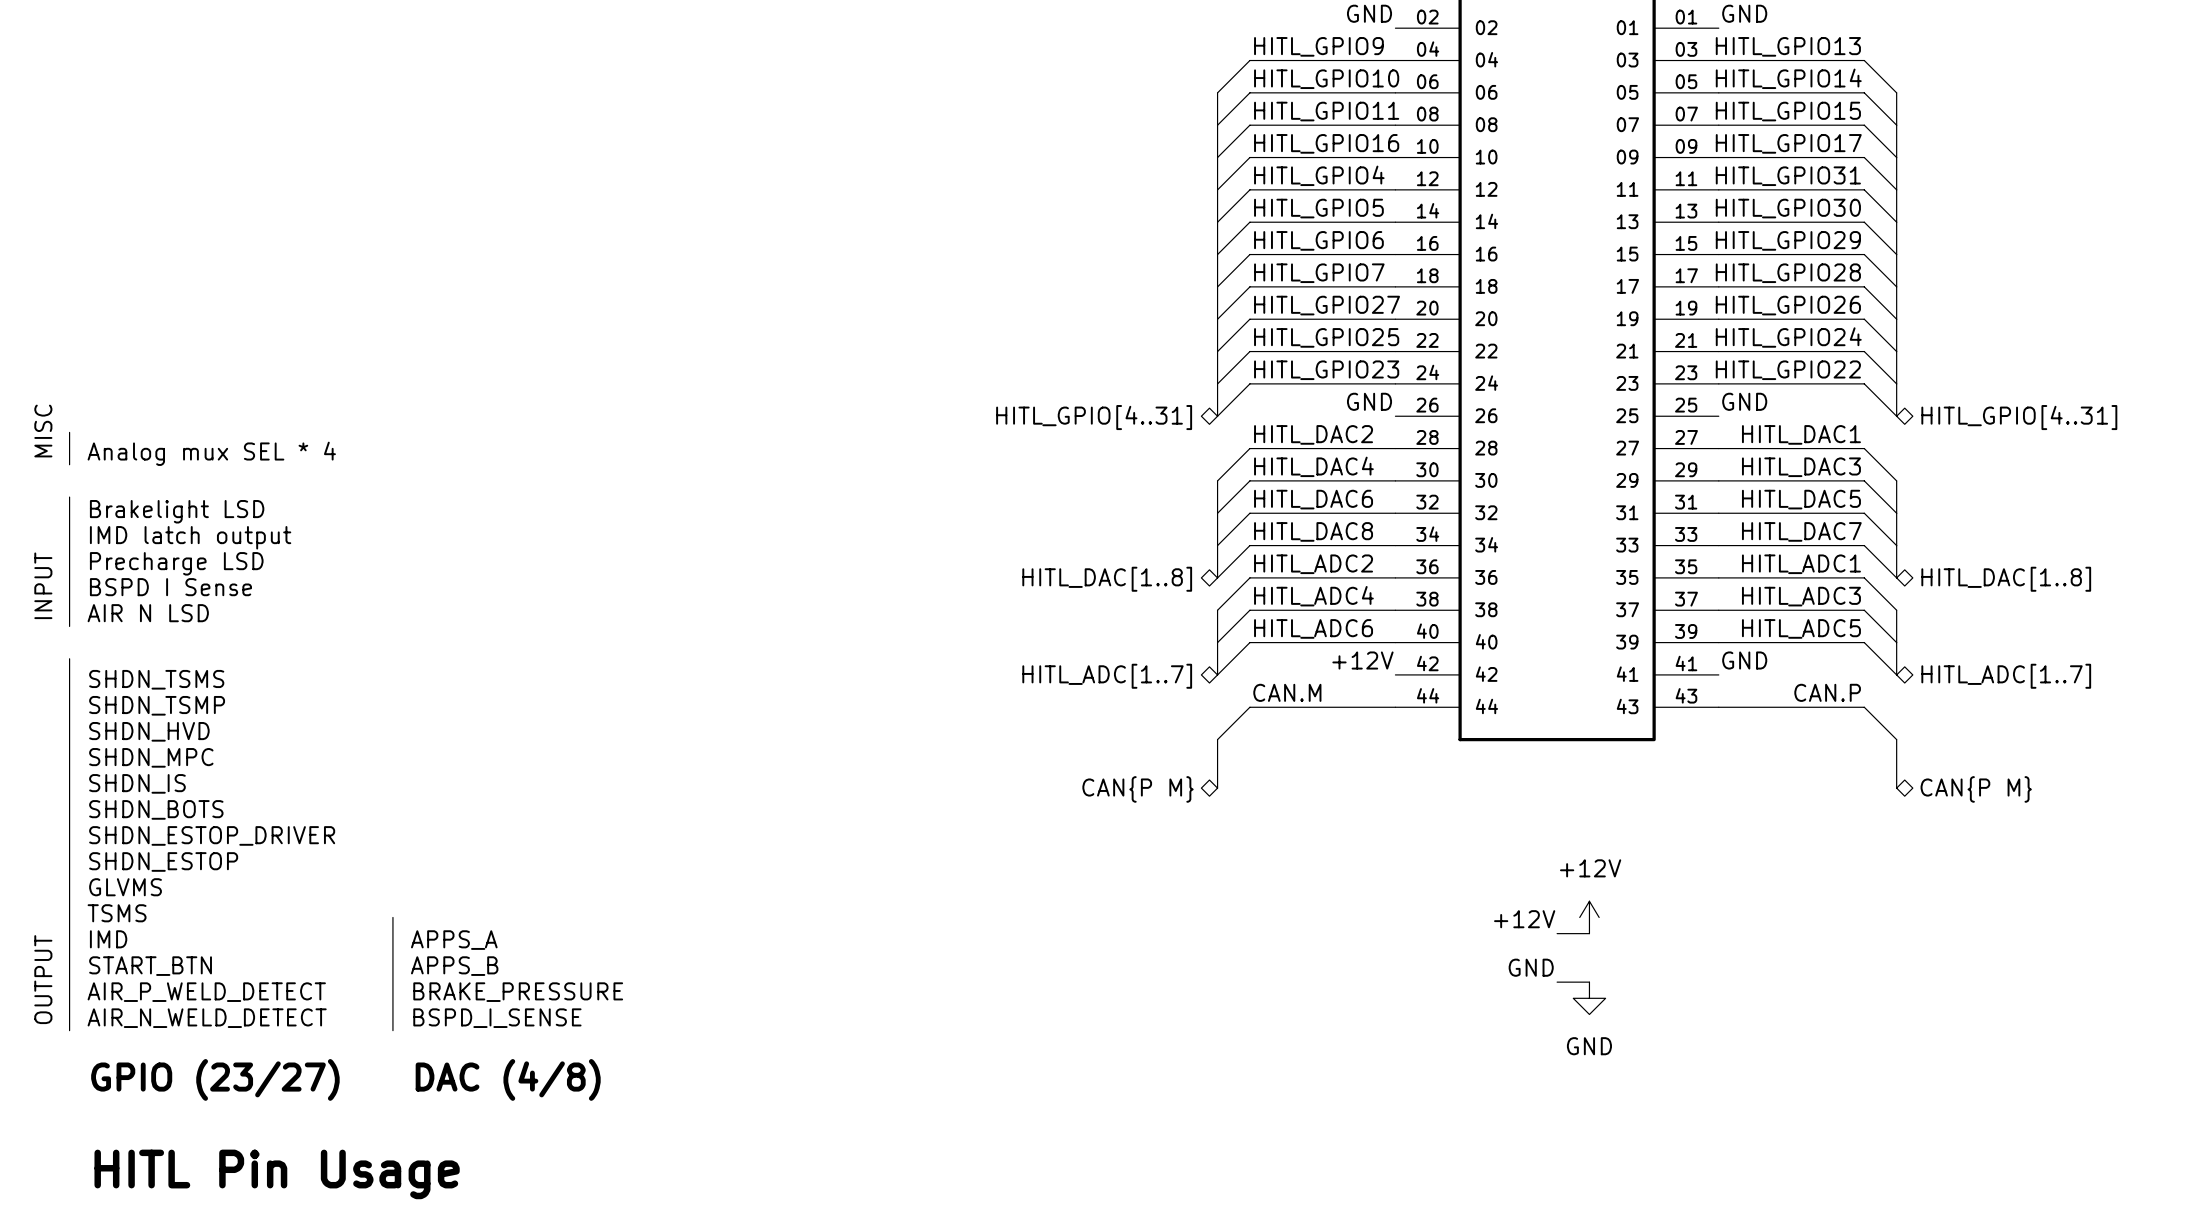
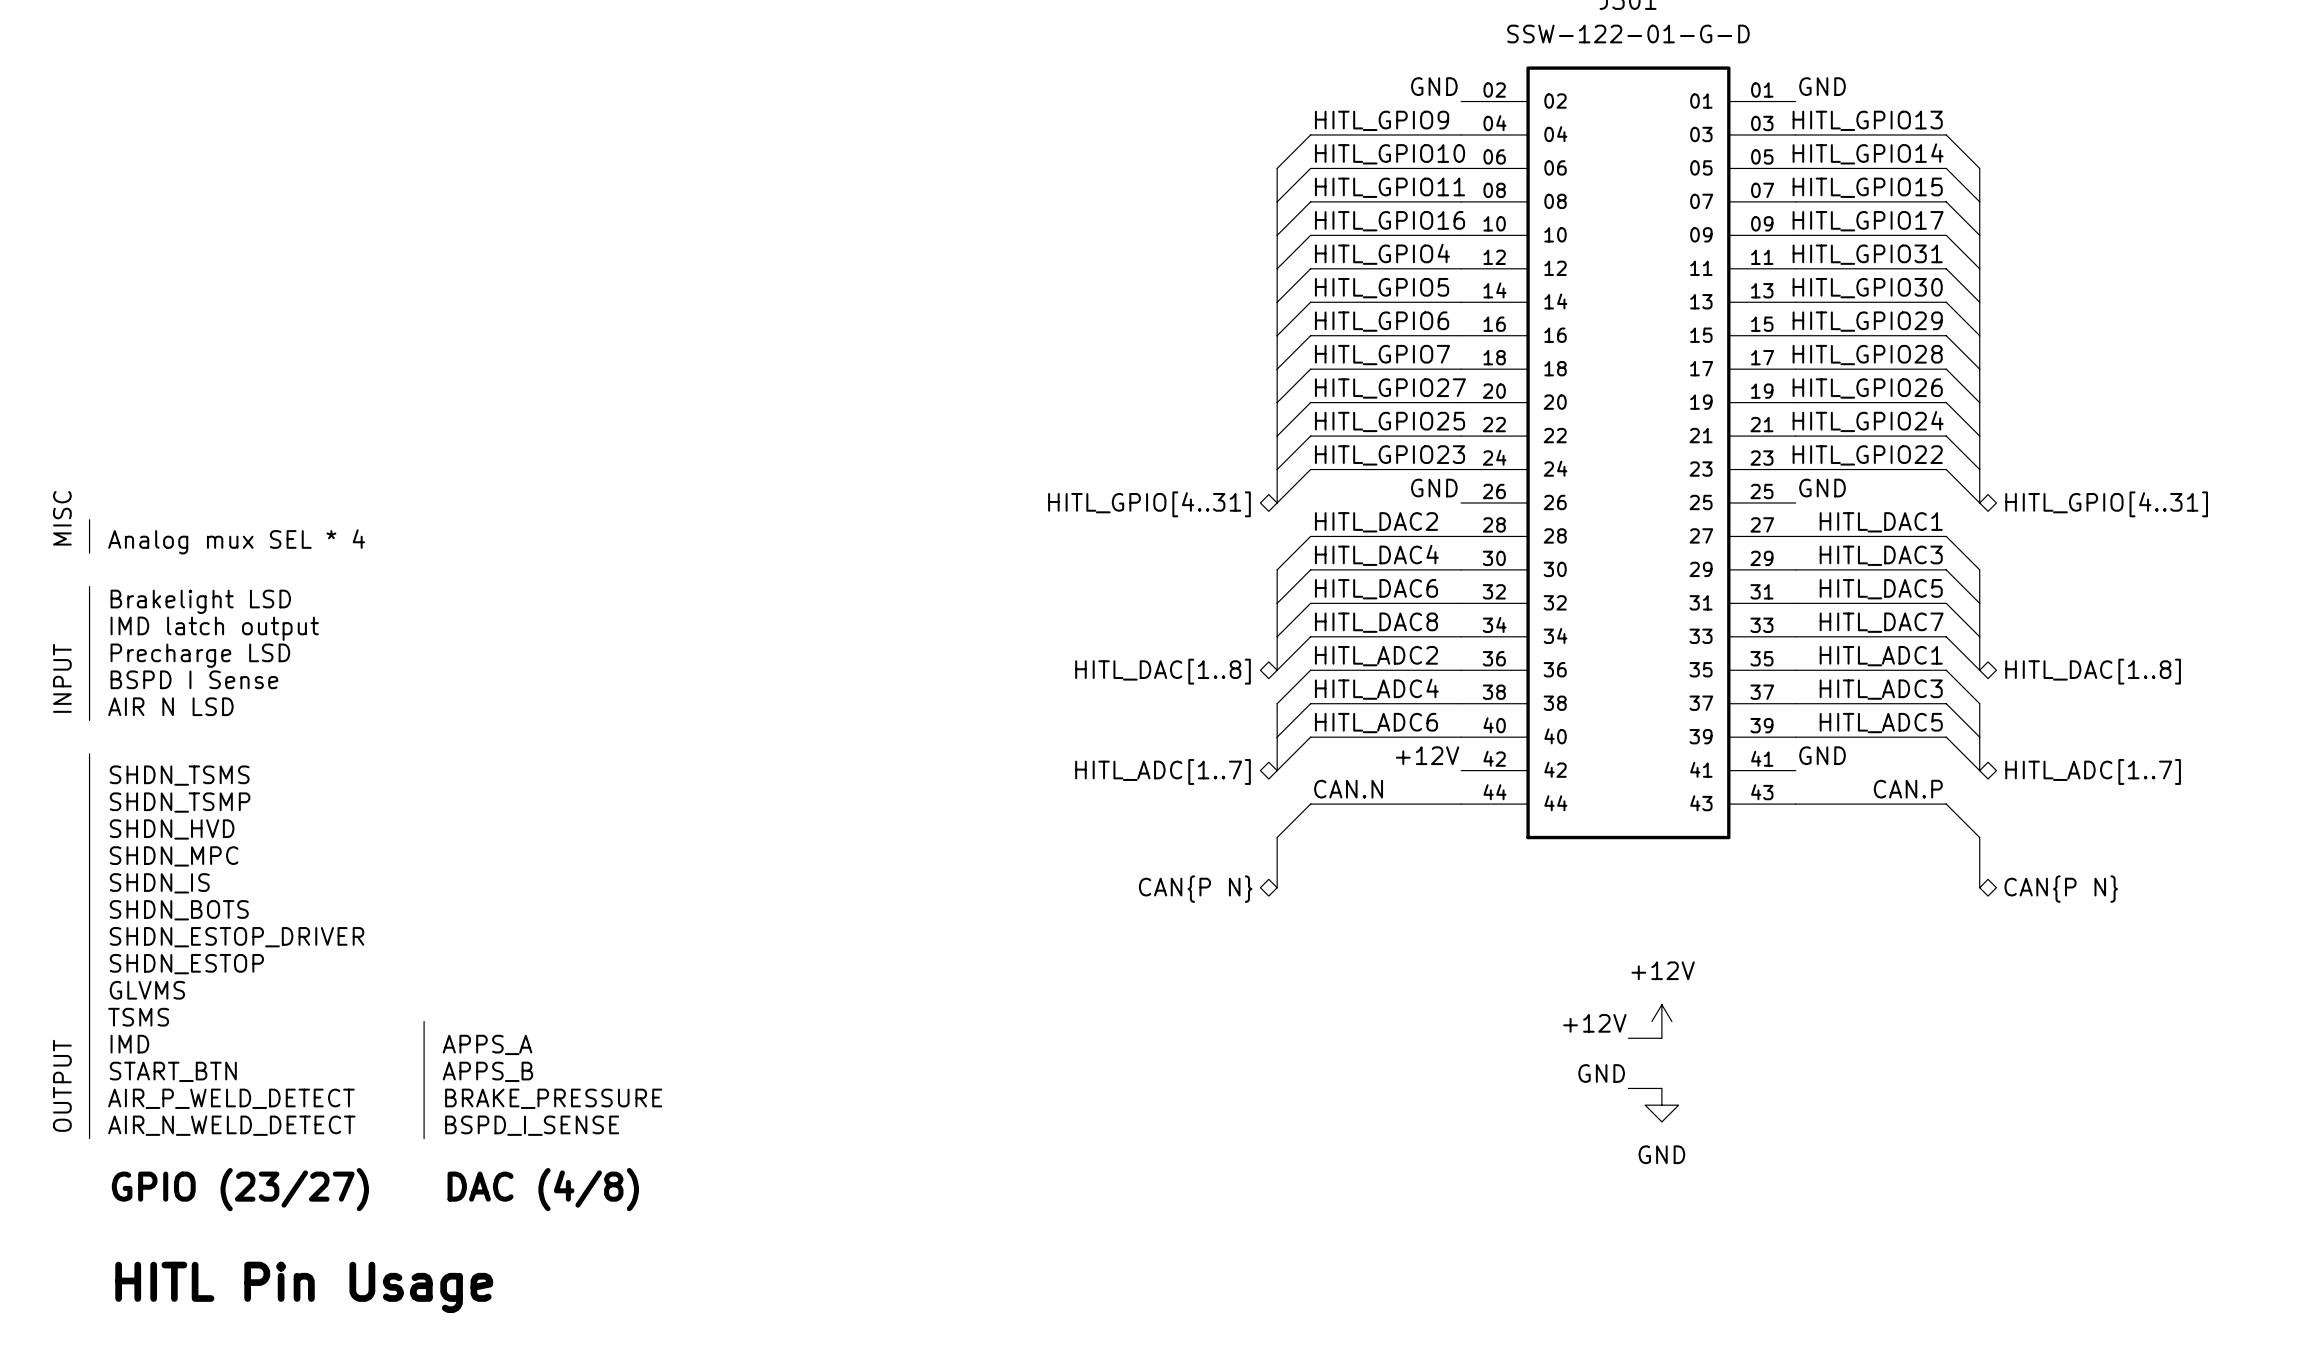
label: CAN.M (1287, 692) -> CAN.N (1348, 789)
hierarchical label: CAN{P M} (1138, 789) -> CAN{P N} (1195, 889)
hierarchical label: CAN{P M} (1976, 789) -> CAN{P N} (2061, 889)

